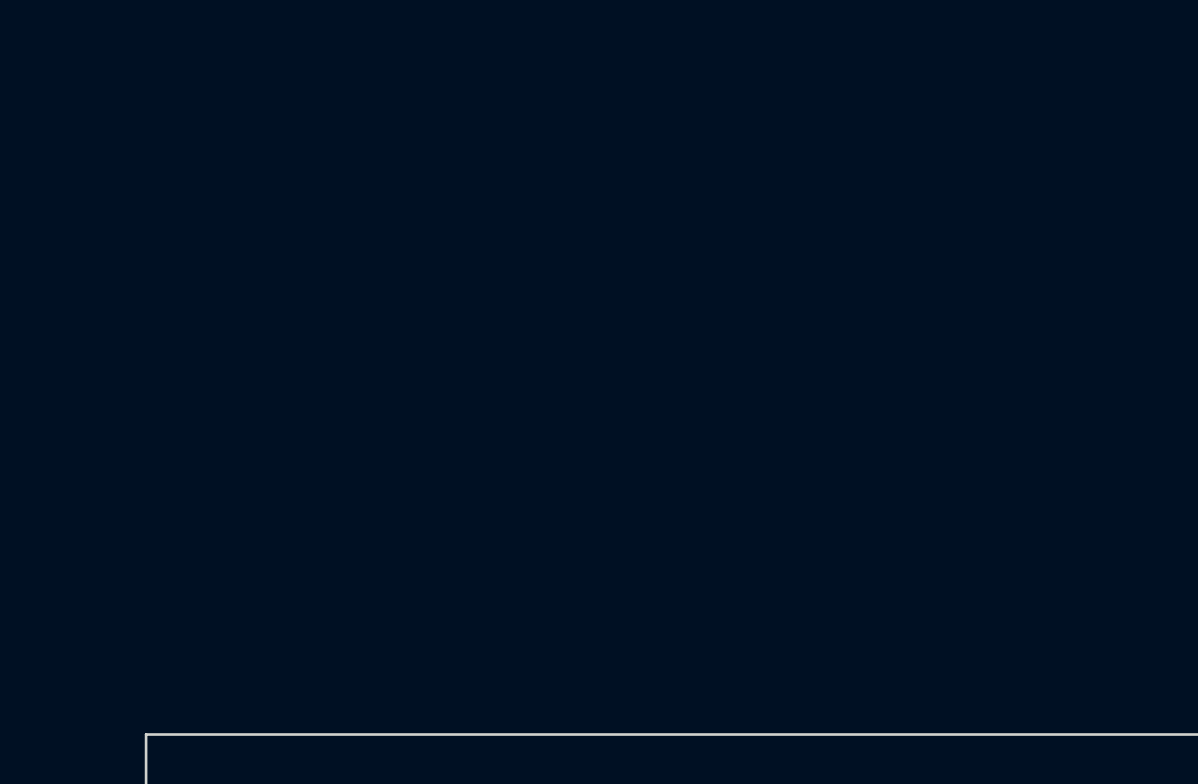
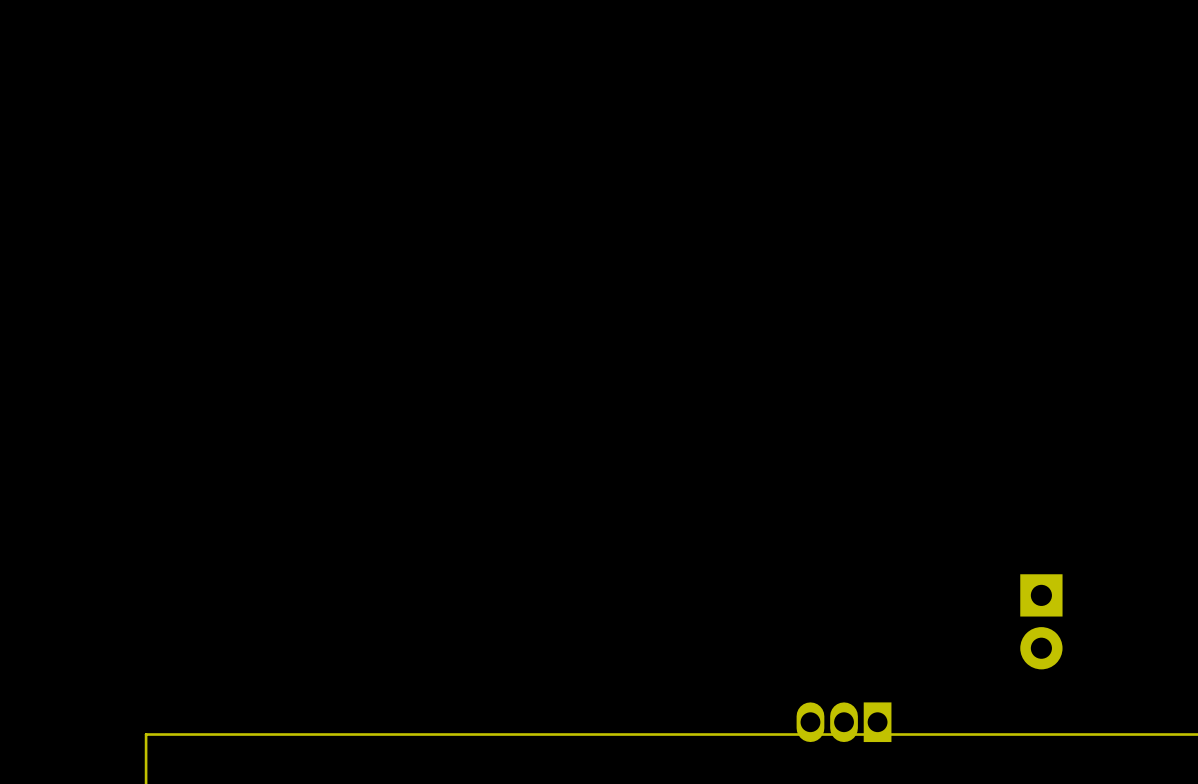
part: none -> (1041, 621)
part: none -> (844, 722)

